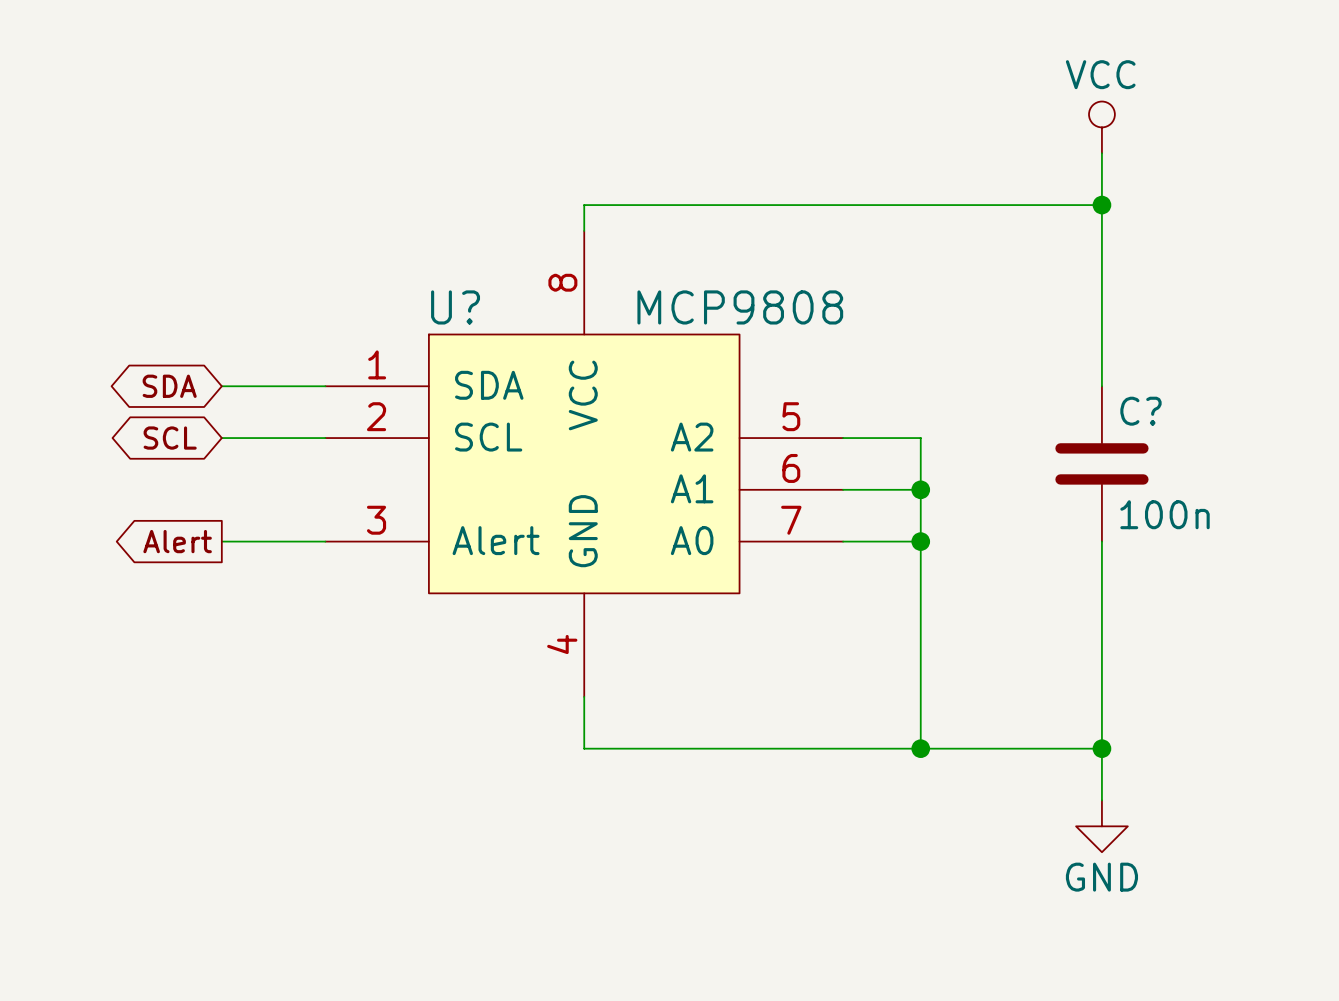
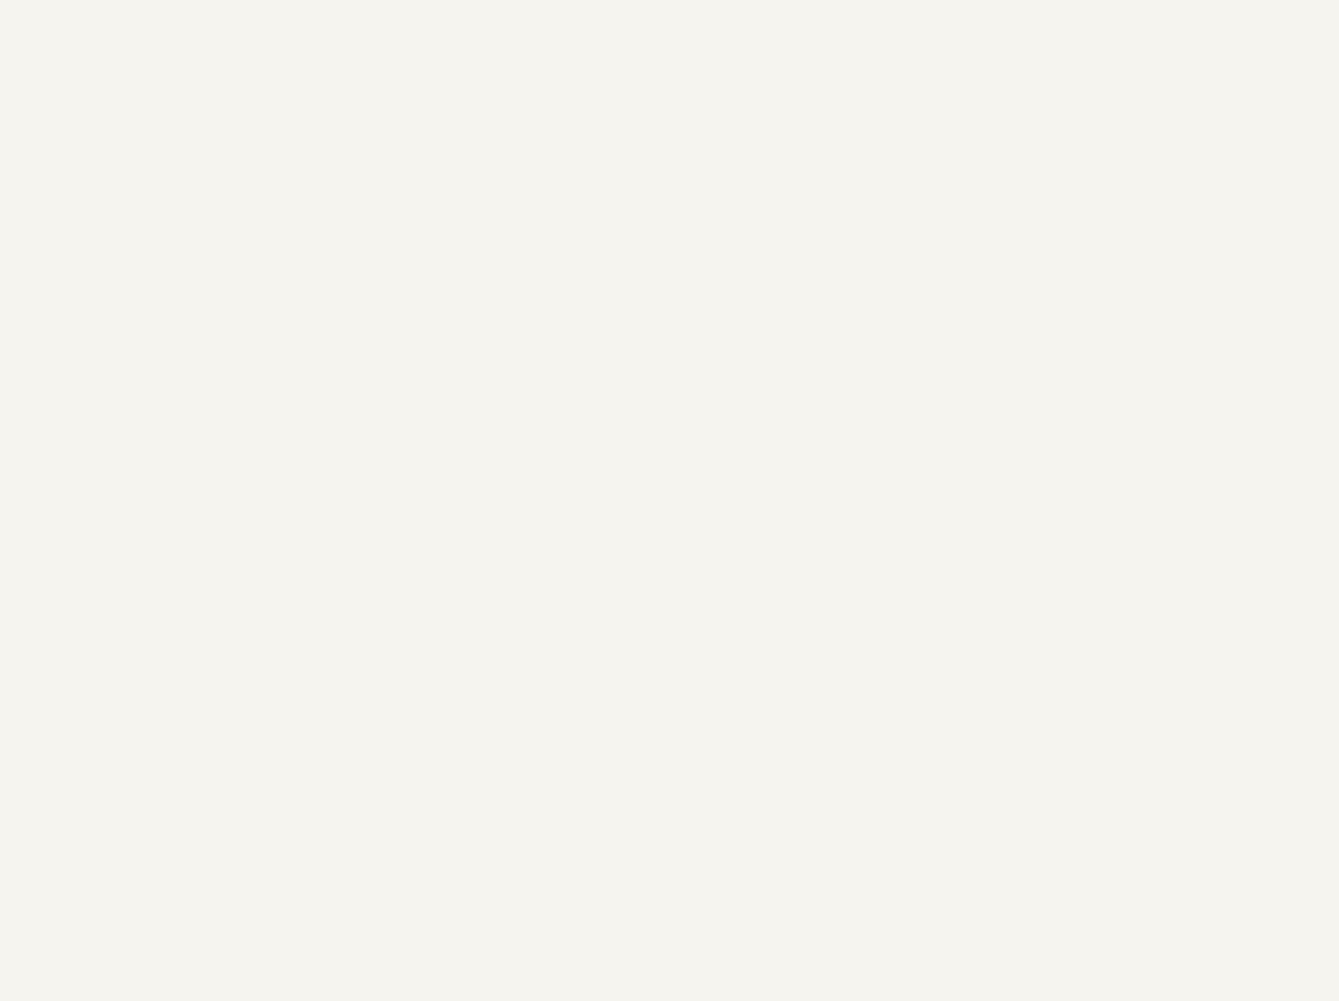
power symbol: VCC (1101, 127) -> none
wire: (1101, 153) (1101, 386) -> none
wire: (1101, 205) (584, 205) (584, 230) -> none
junction: (1101, 205) -> none
global label: SDA (169, 386) -> none
wire: (221, 386) (325, 386) -> none
global label: SCL (170, 438) -> none
wire: (221, 438) (325, 438) -> none
wire: (843, 438) (920, 438) (920, 748) -> none
U?: MCP9808 (584, 463) -> none
C?: 100n (1101, 463) -> none
wire: (843, 489) (920, 489) -> none
junction: (920, 489) -> none
global label: Alert (177, 541) -> none
wire: (221, 541) (325, 541) -> none
wire: (843, 541) (920, 541) -> none
junction: (920, 541) -> none
wire: (1101, 541) (1101, 800) -> none
wire: (584, 696) (584, 748) (1101, 748) -> none
junction: (920, 748) -> none
junction: (1101, 748) -> none
power symbol: GND (1101, 826) -> none

